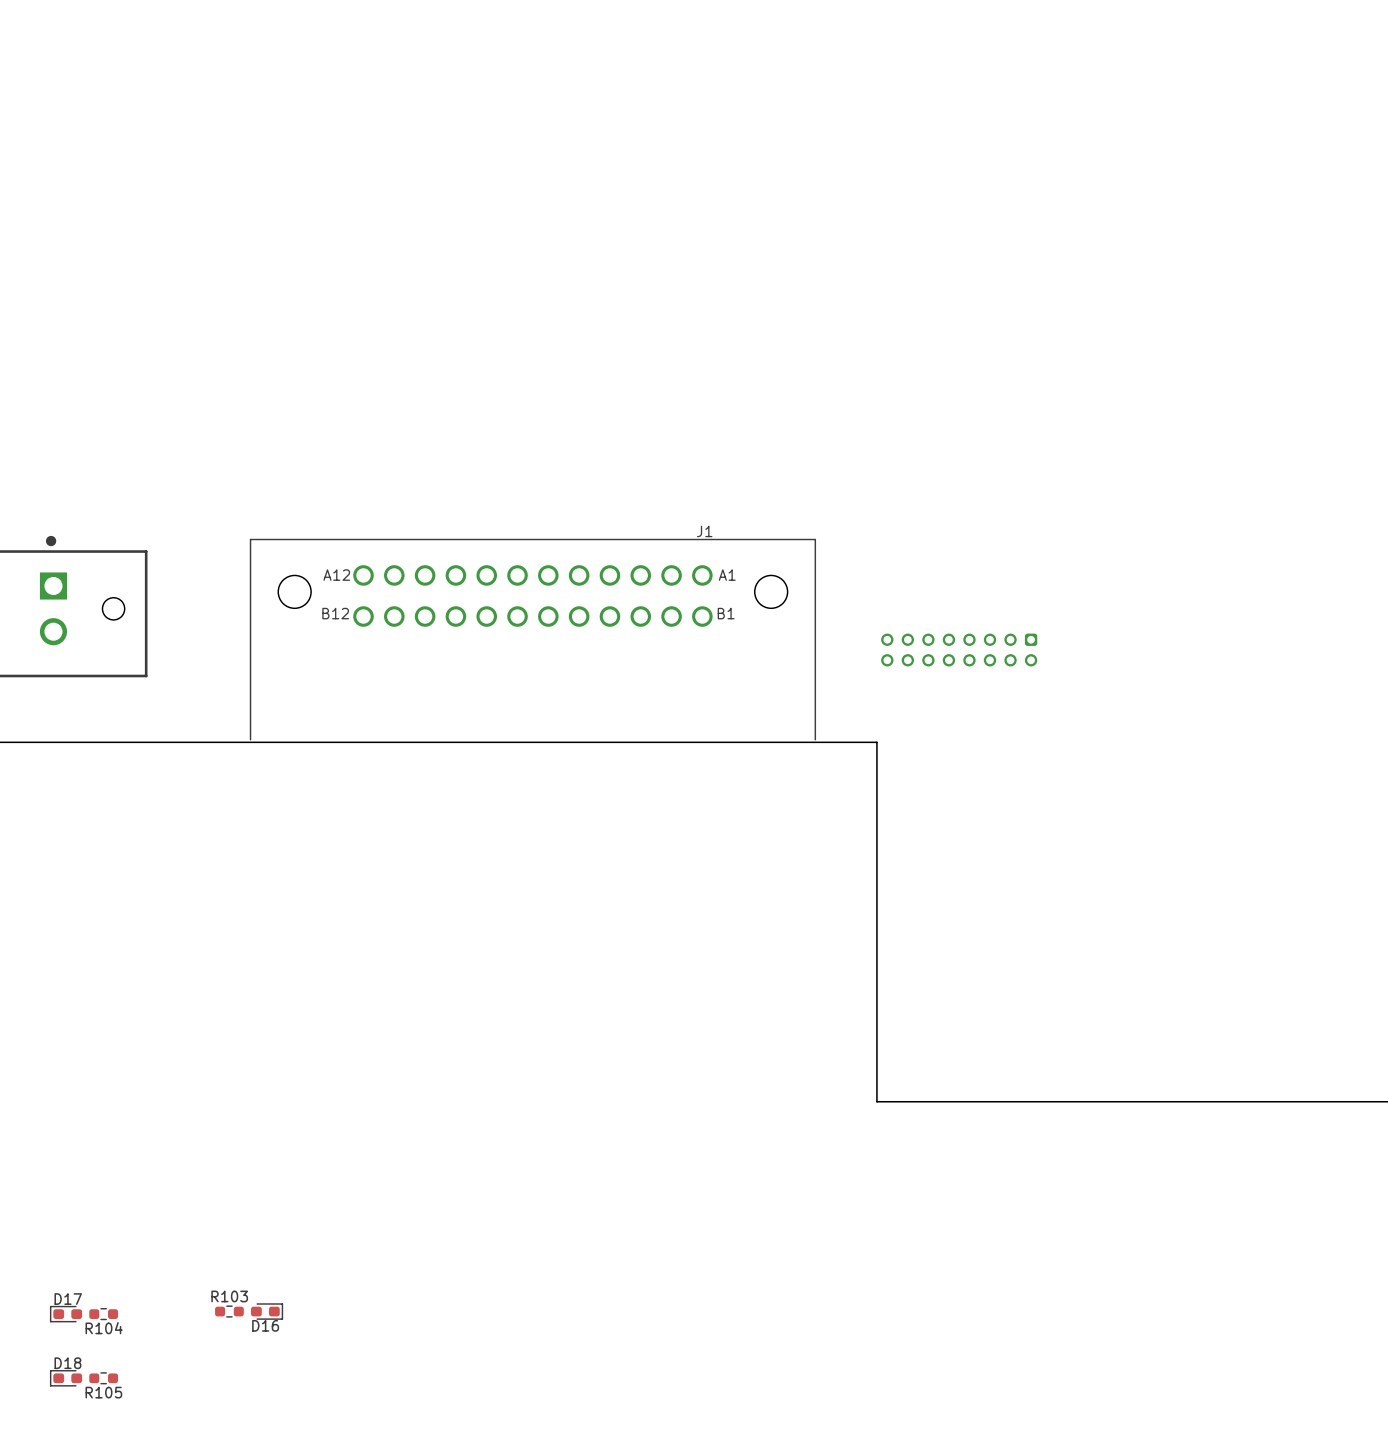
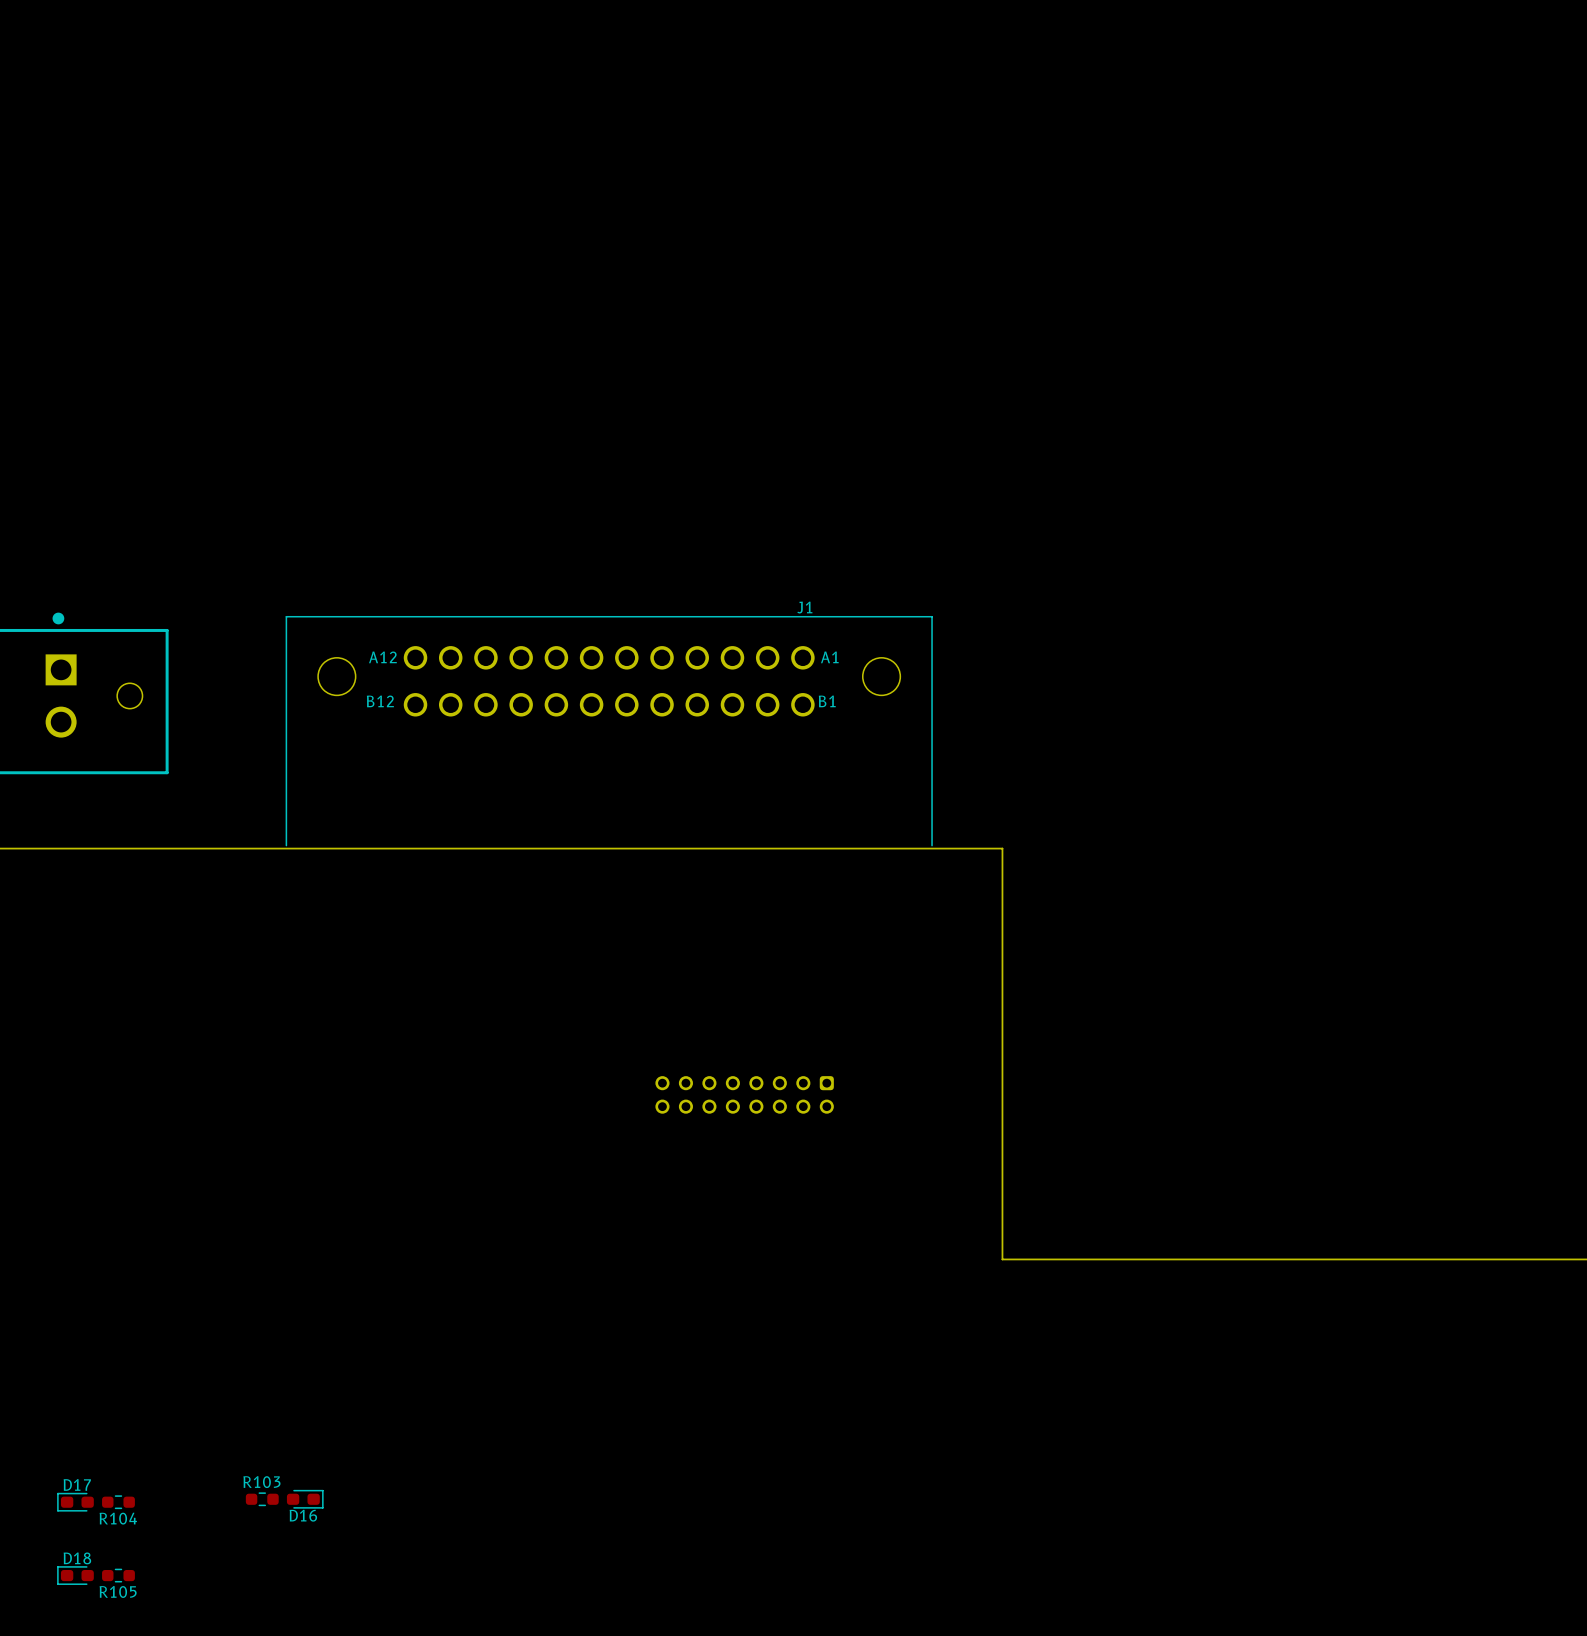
part: (959, 650) -> none
part: none -> (744, 1094)

